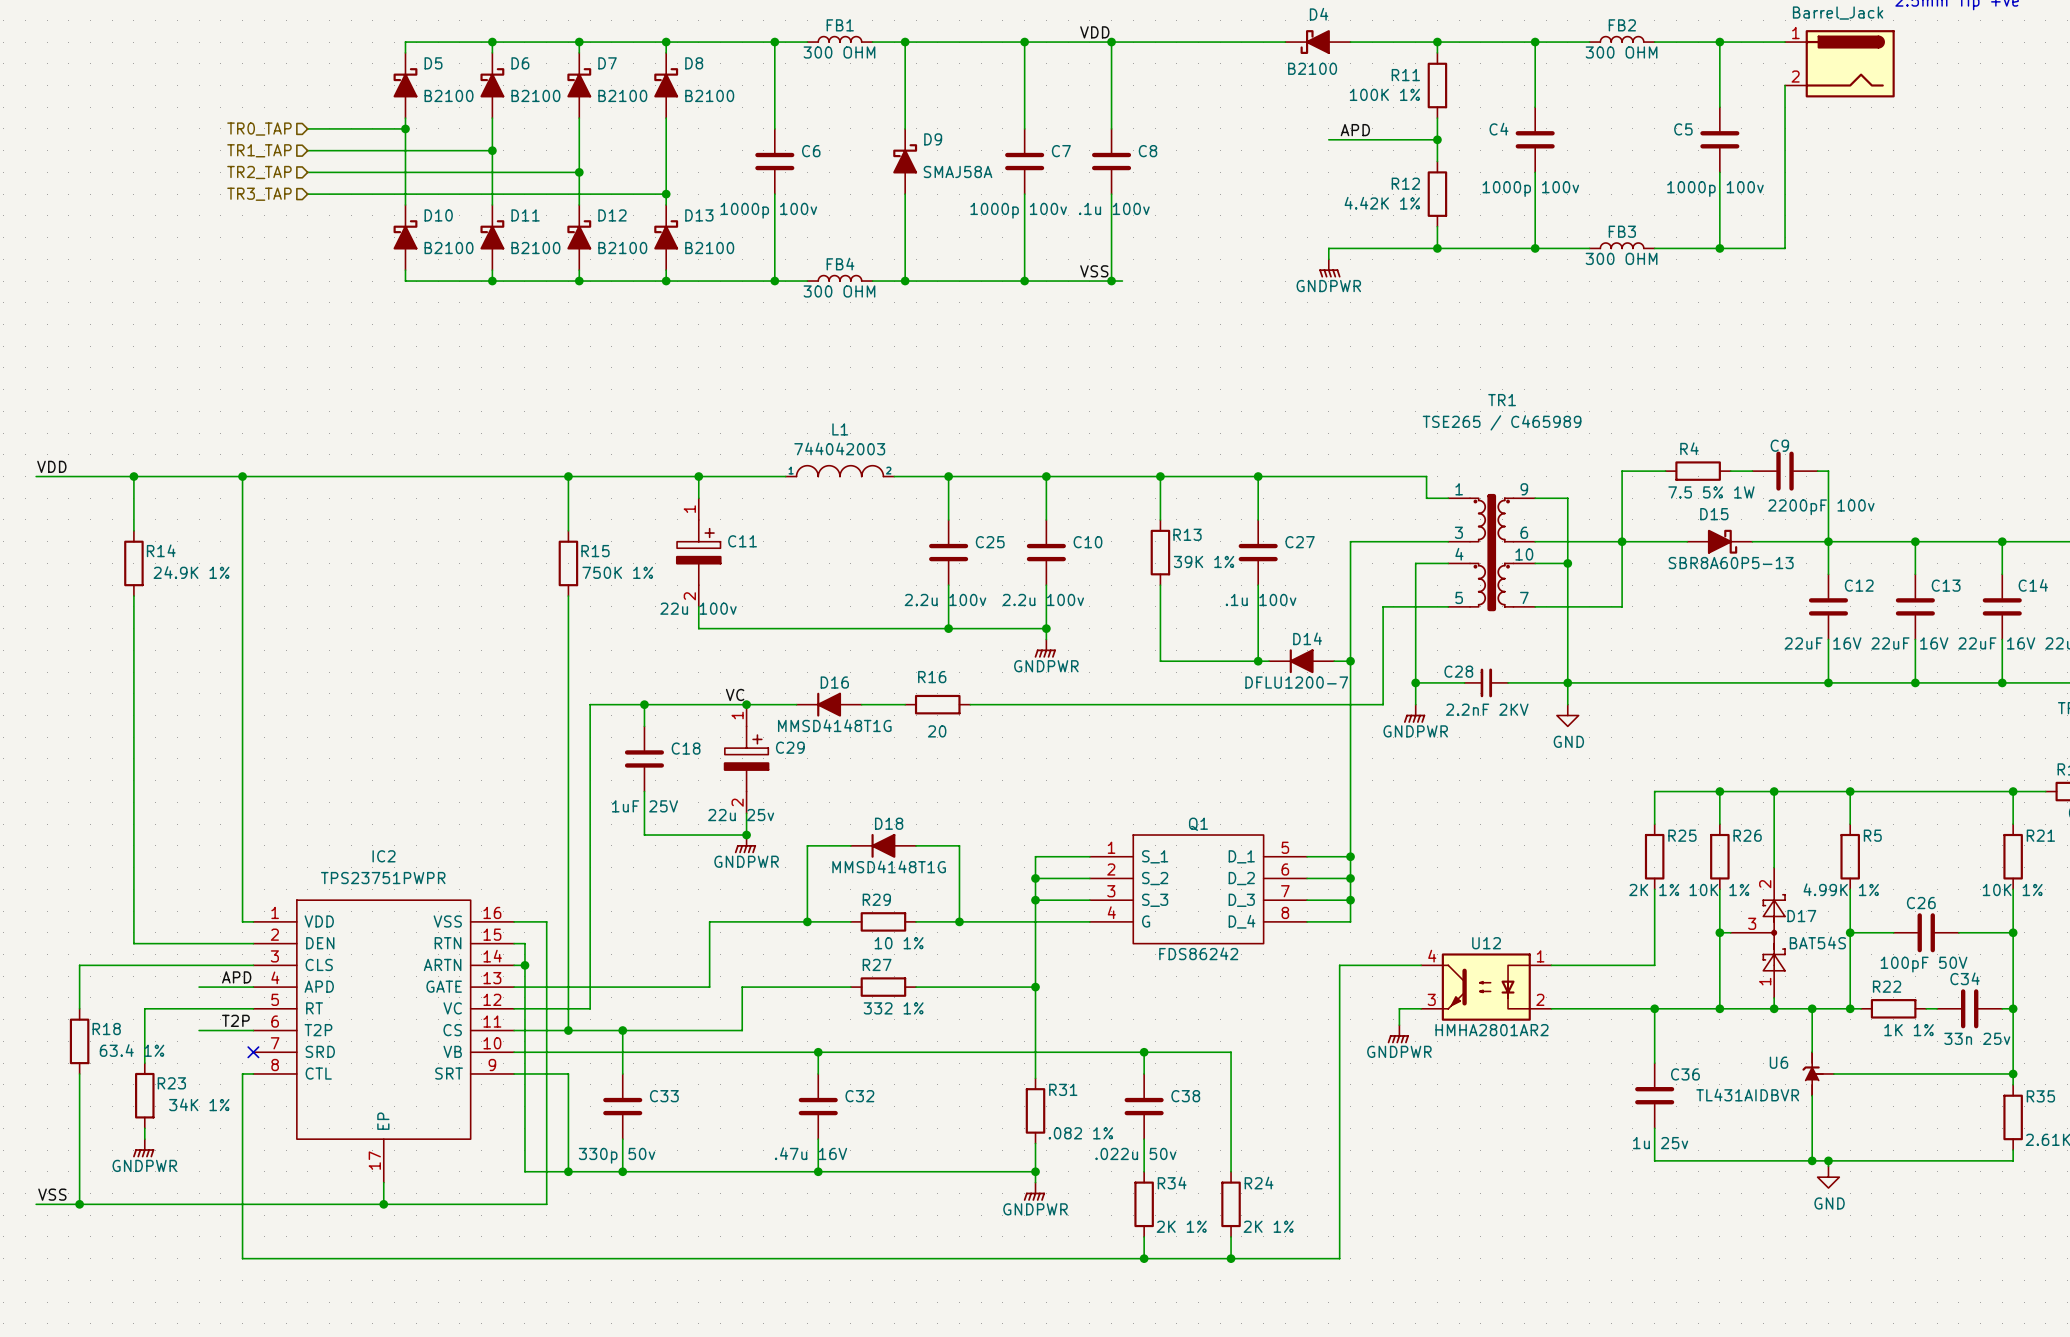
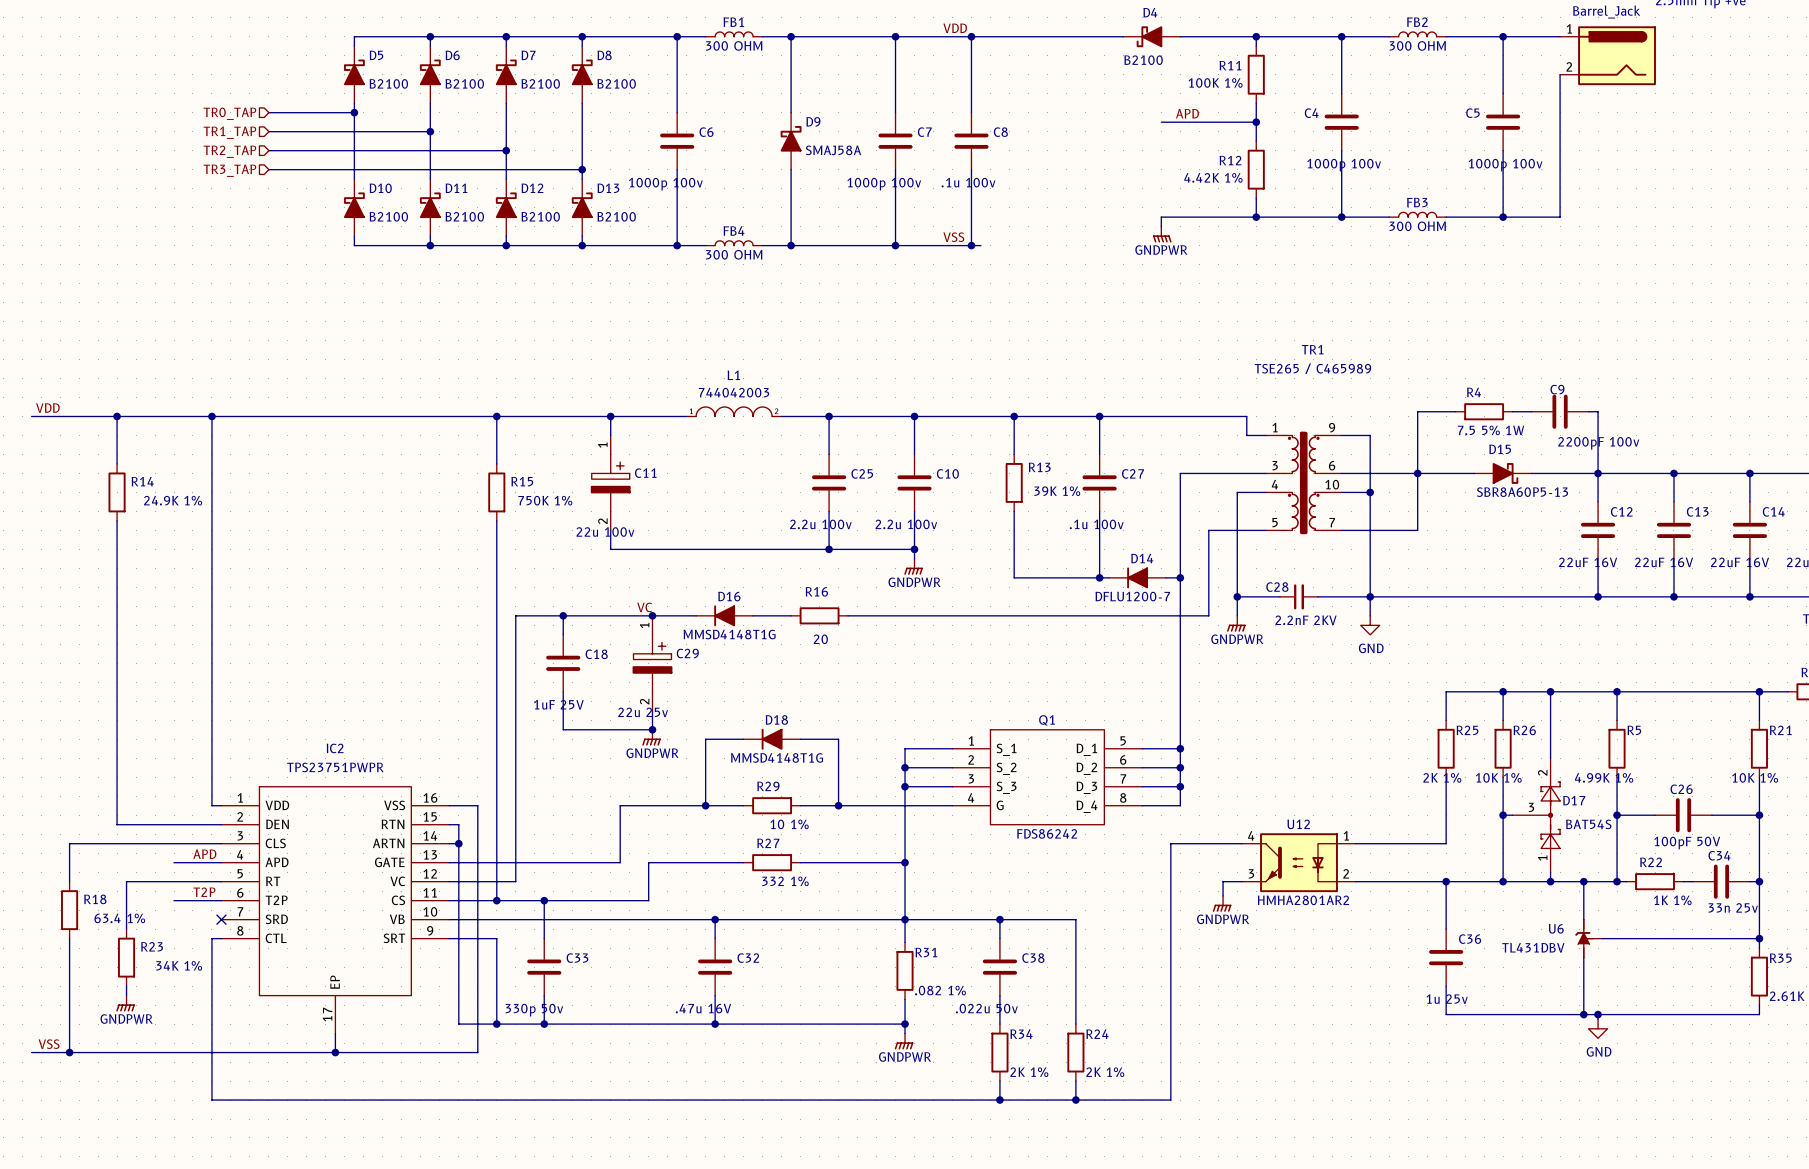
junction: none -> (905, 919)
U6 value: TL431AIDBVR (1747, 1095) -> TL431DBV (1533, 947)

